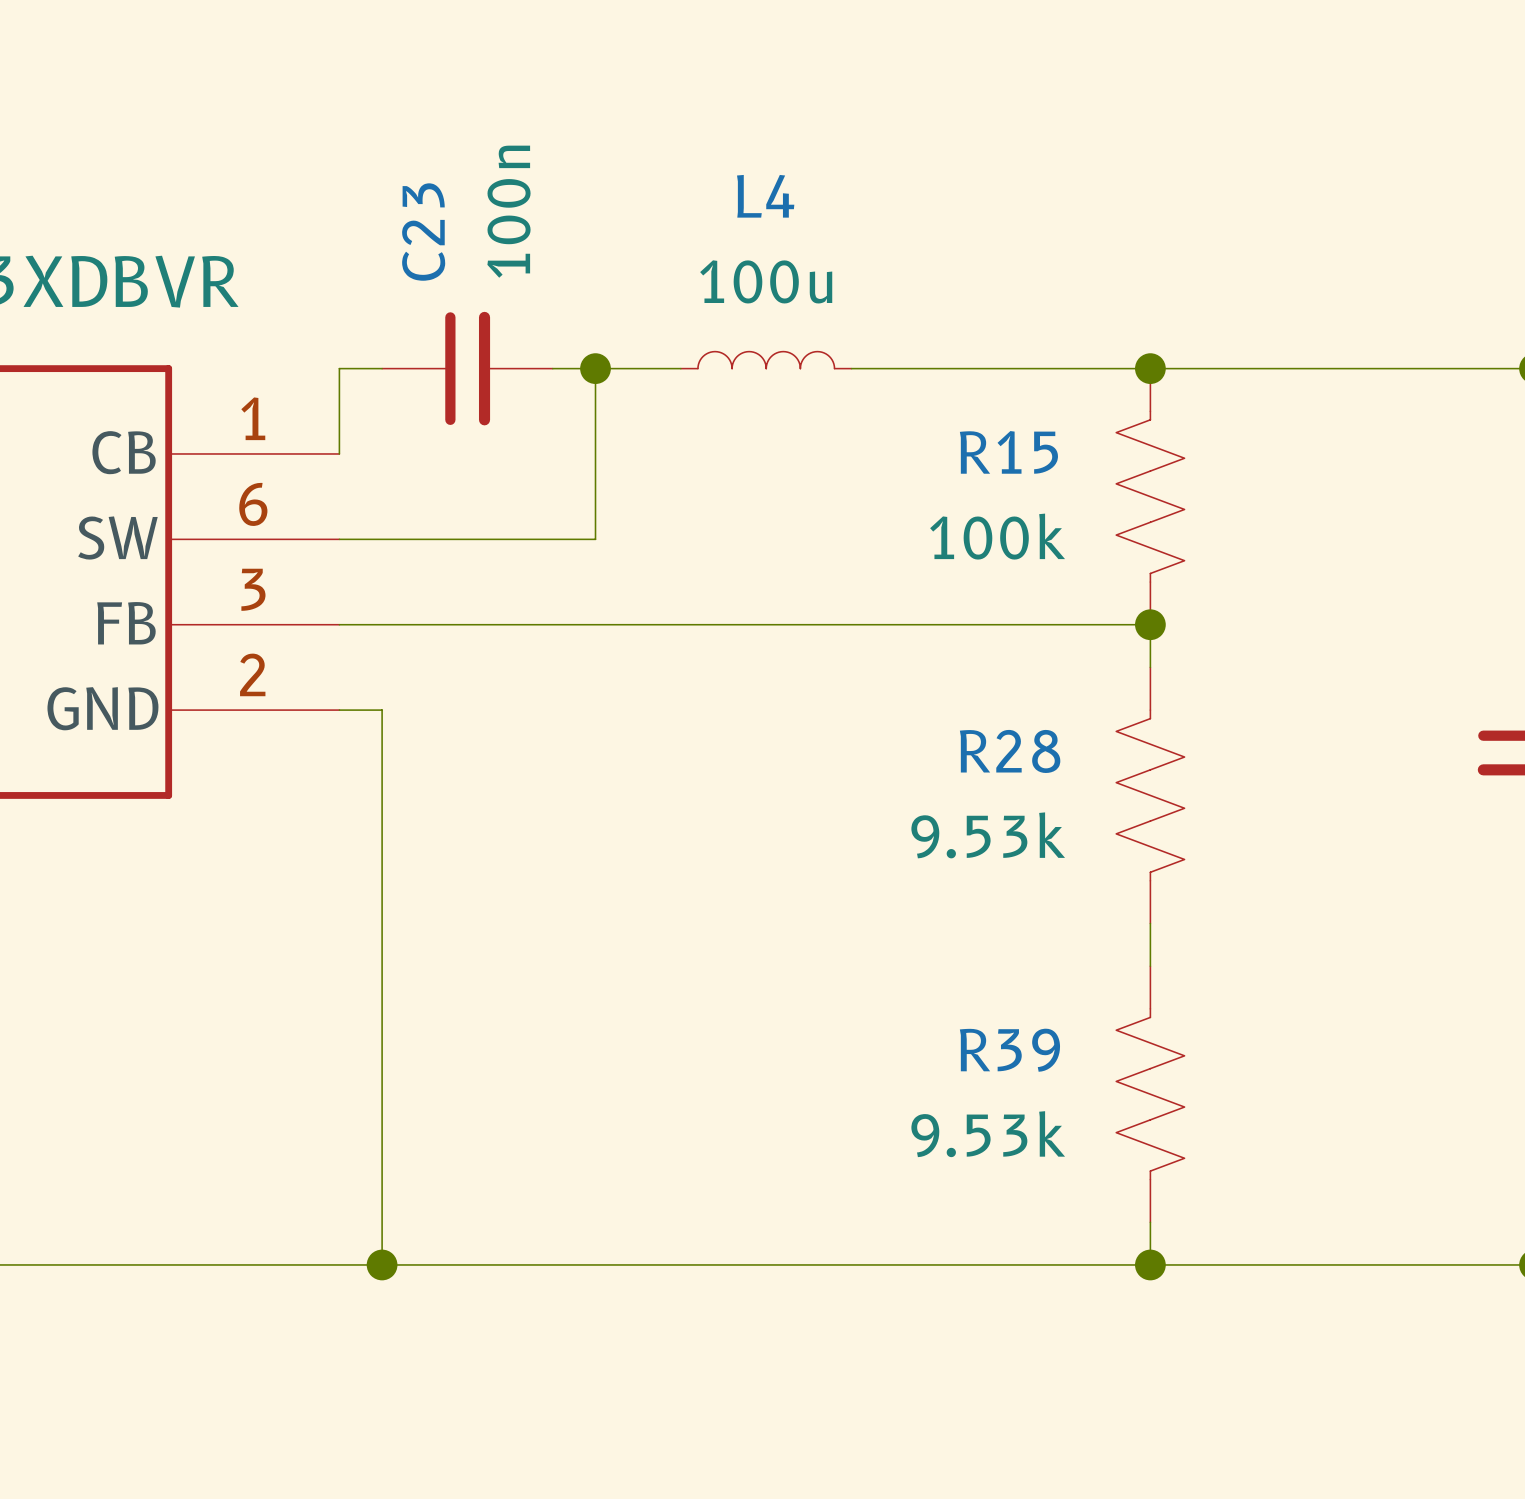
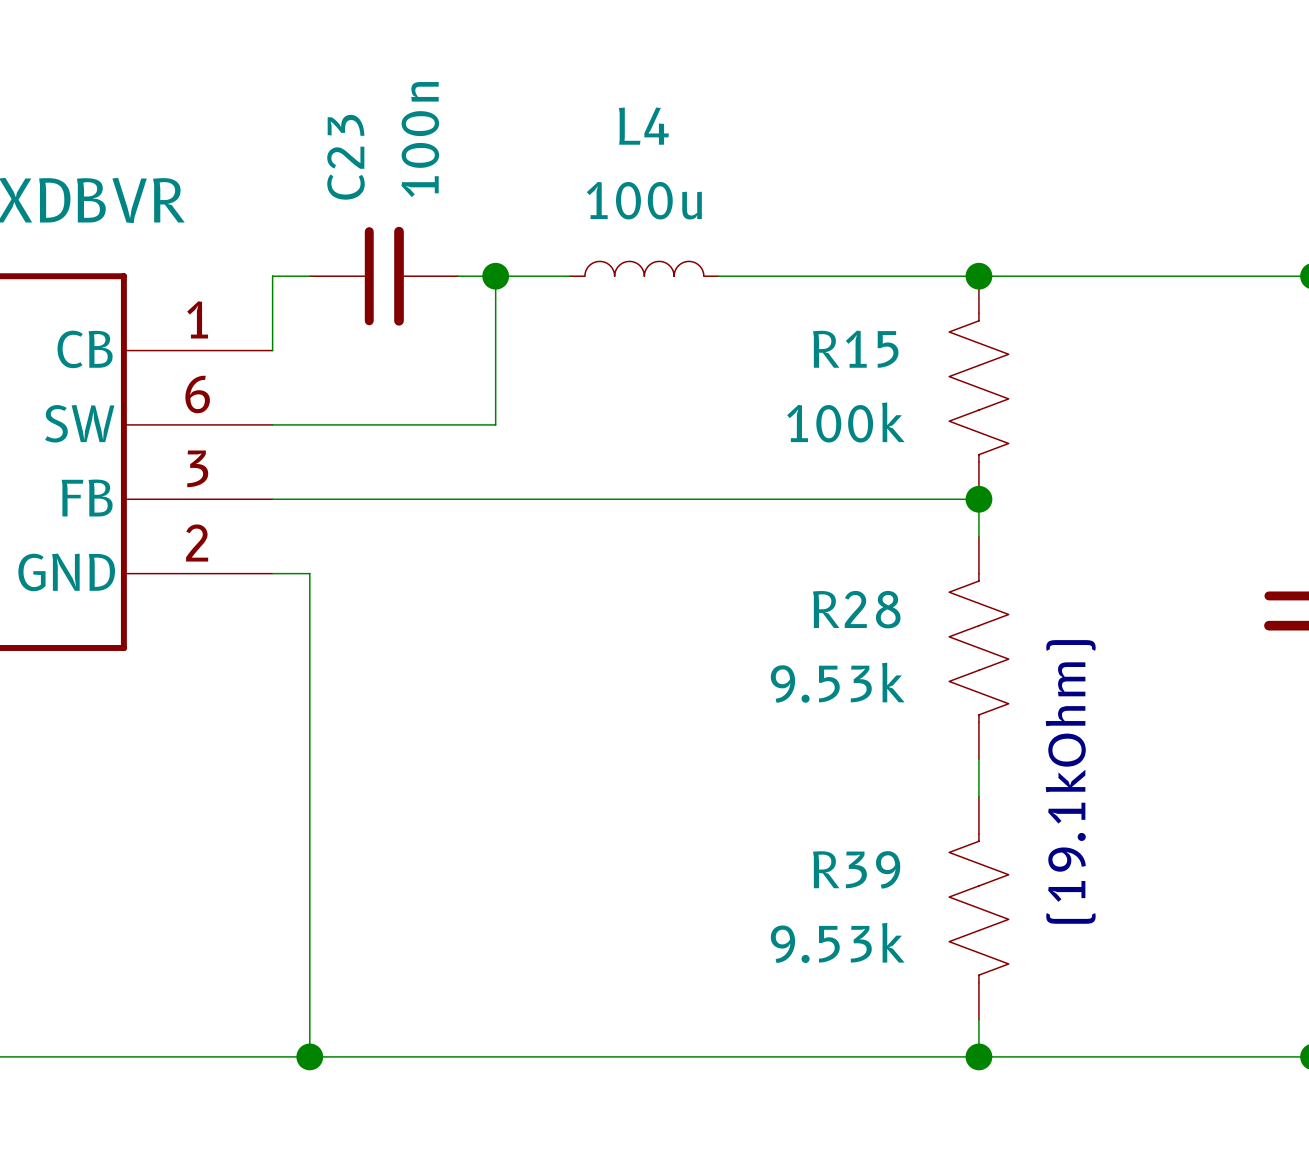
text: none -> (19.1kOhm) (1070, 781)

